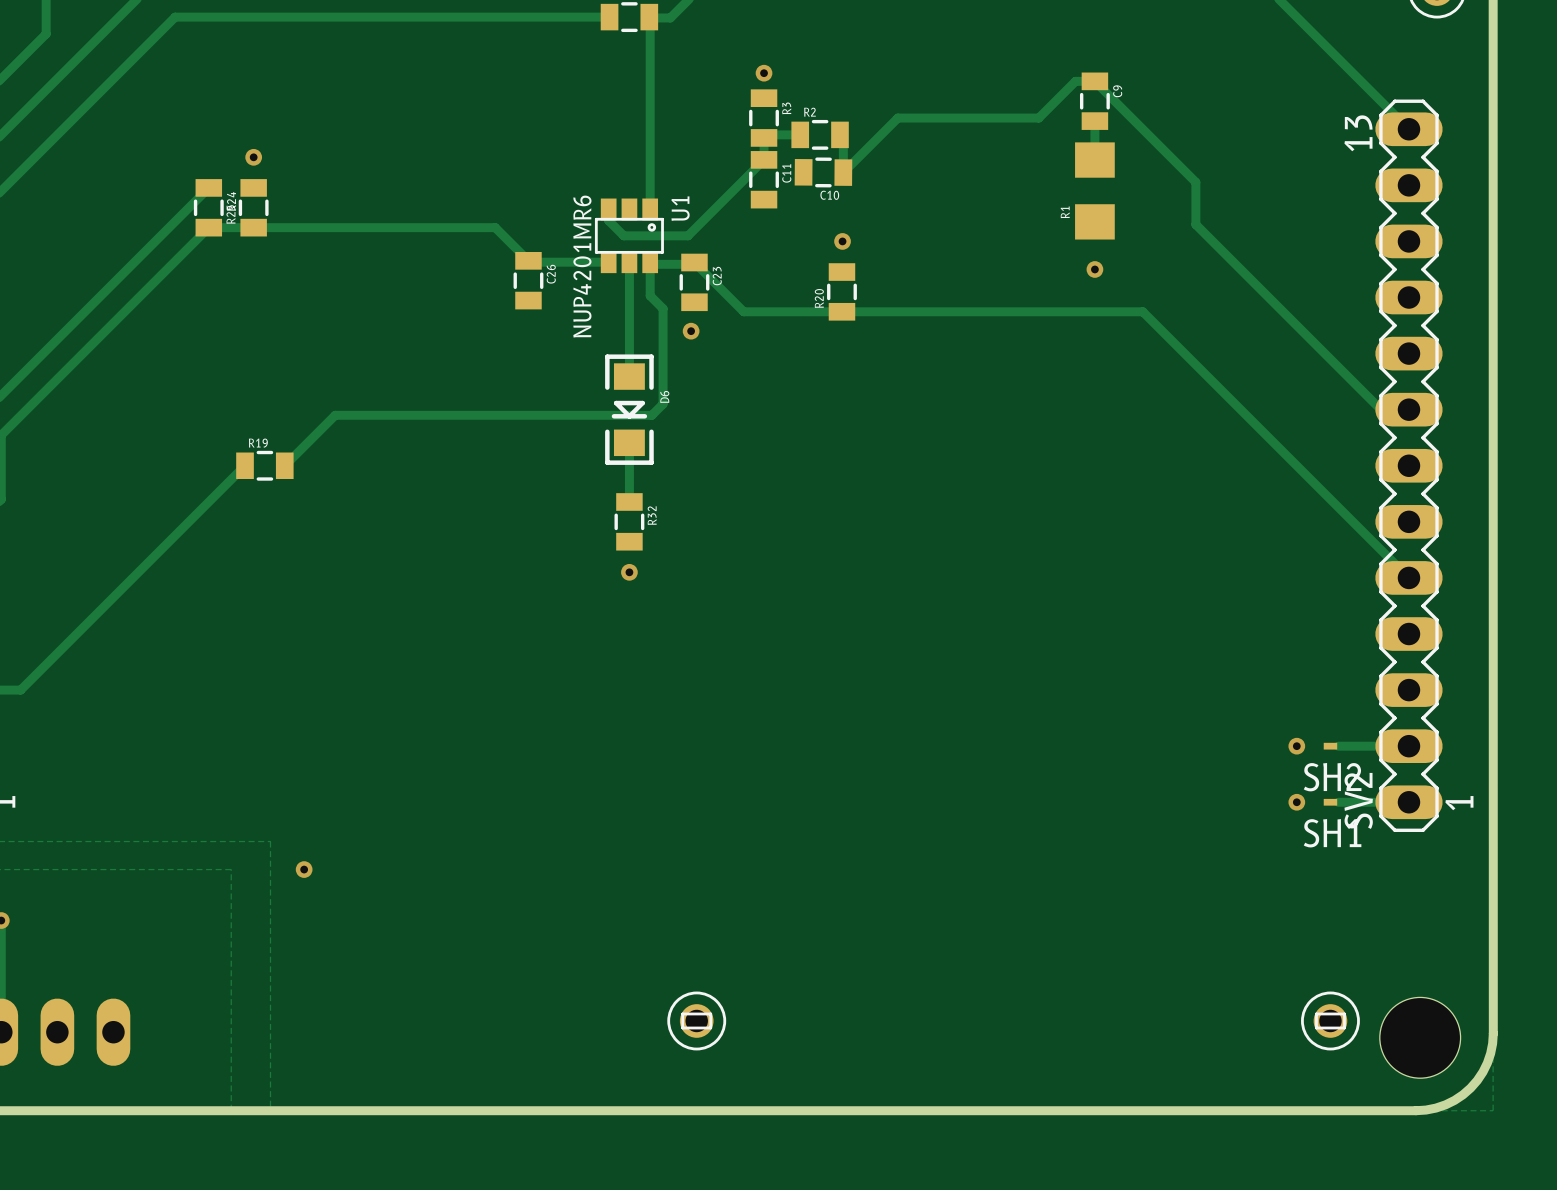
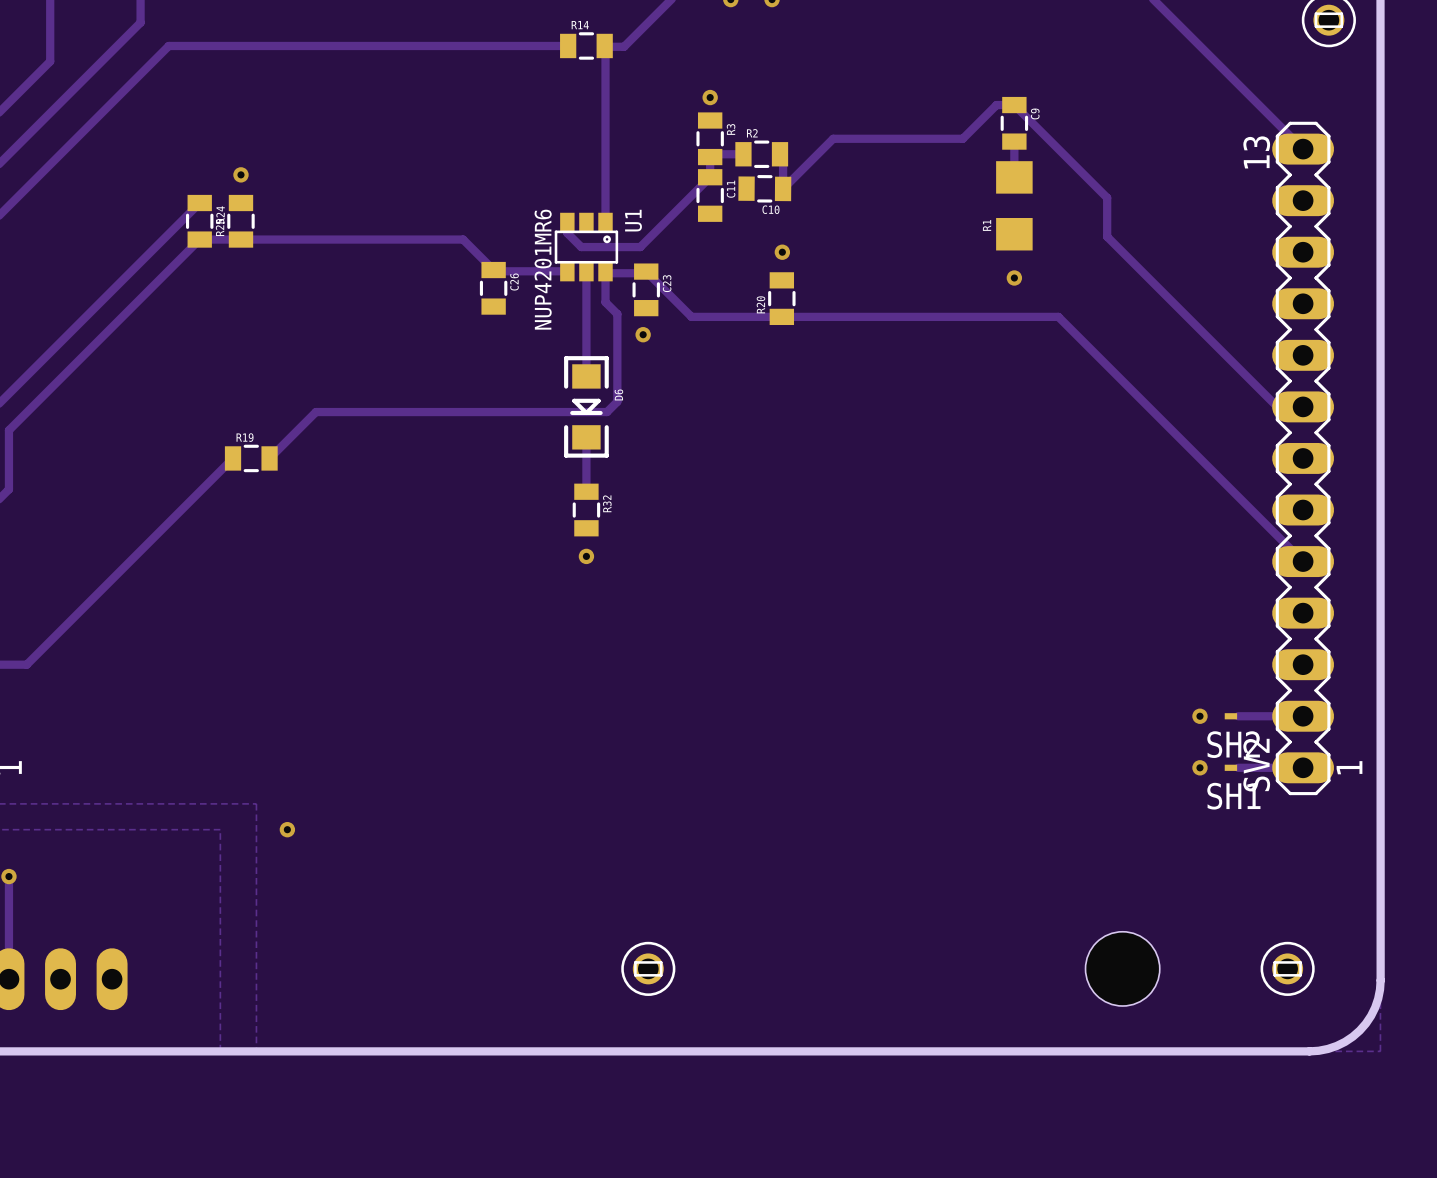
part position: (1330, 1020) -> (1287, 968)
hole position: (1420, 1037) -> (1122, 968)

